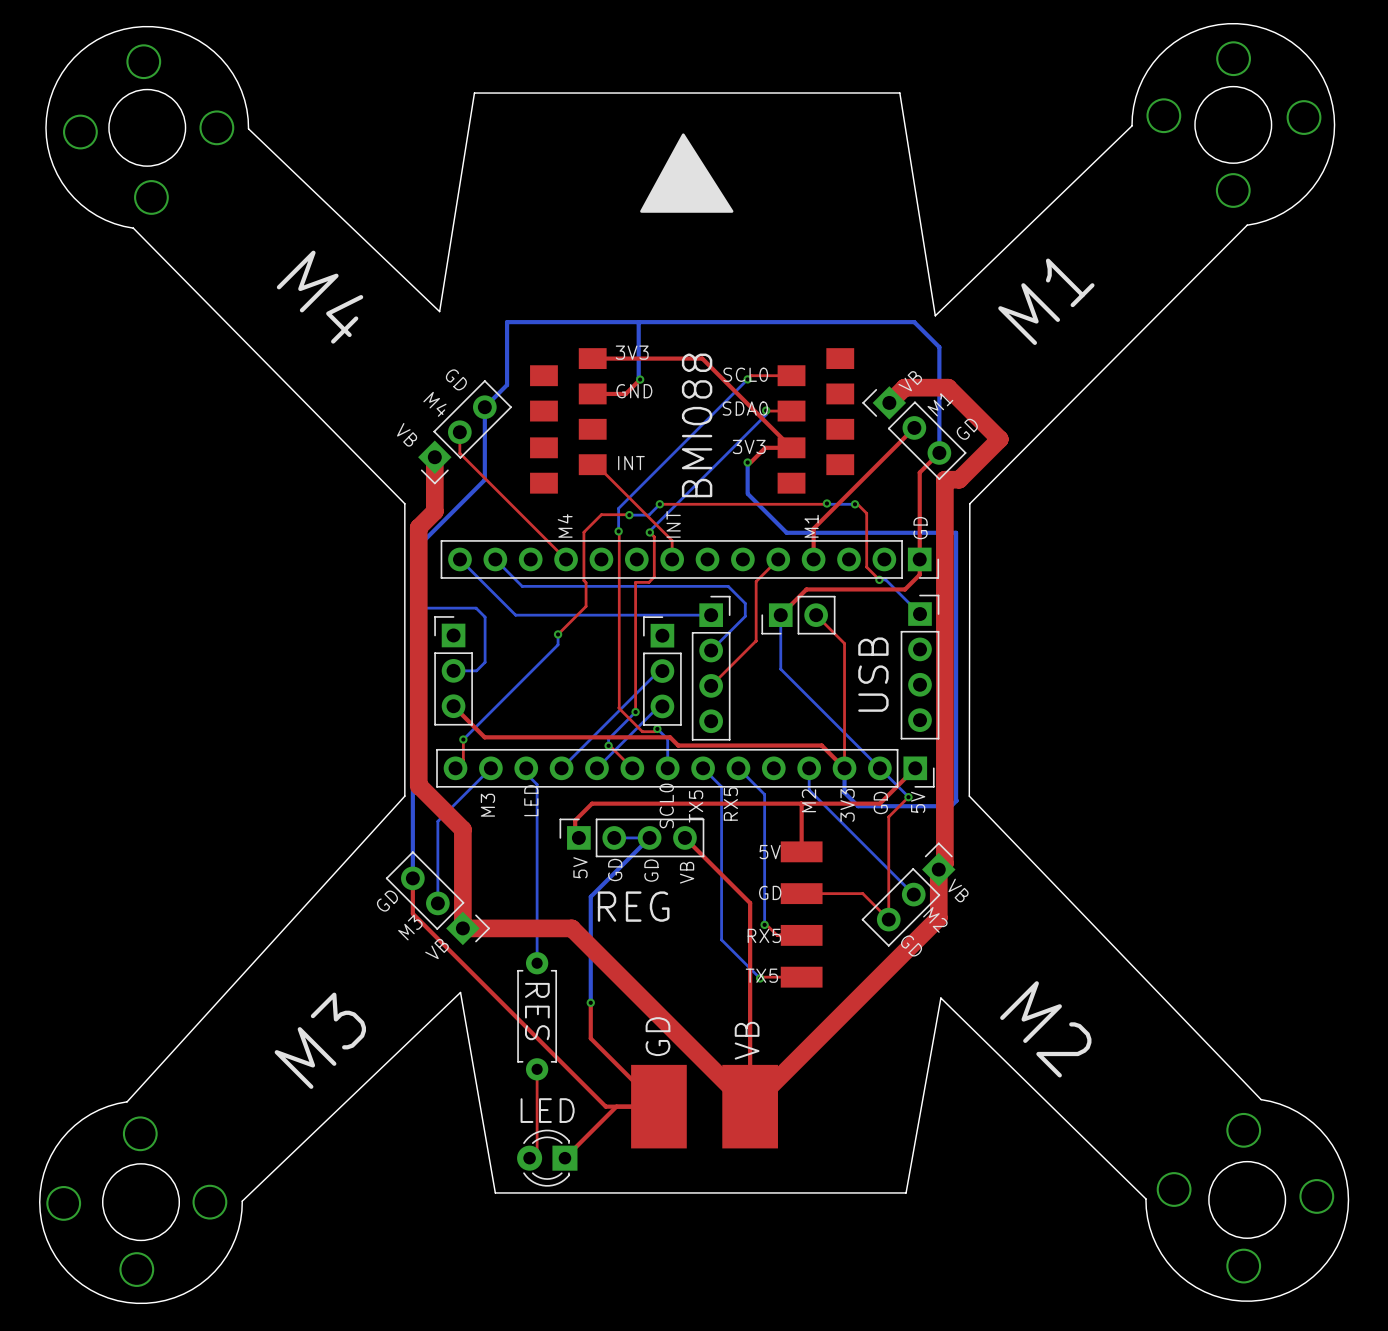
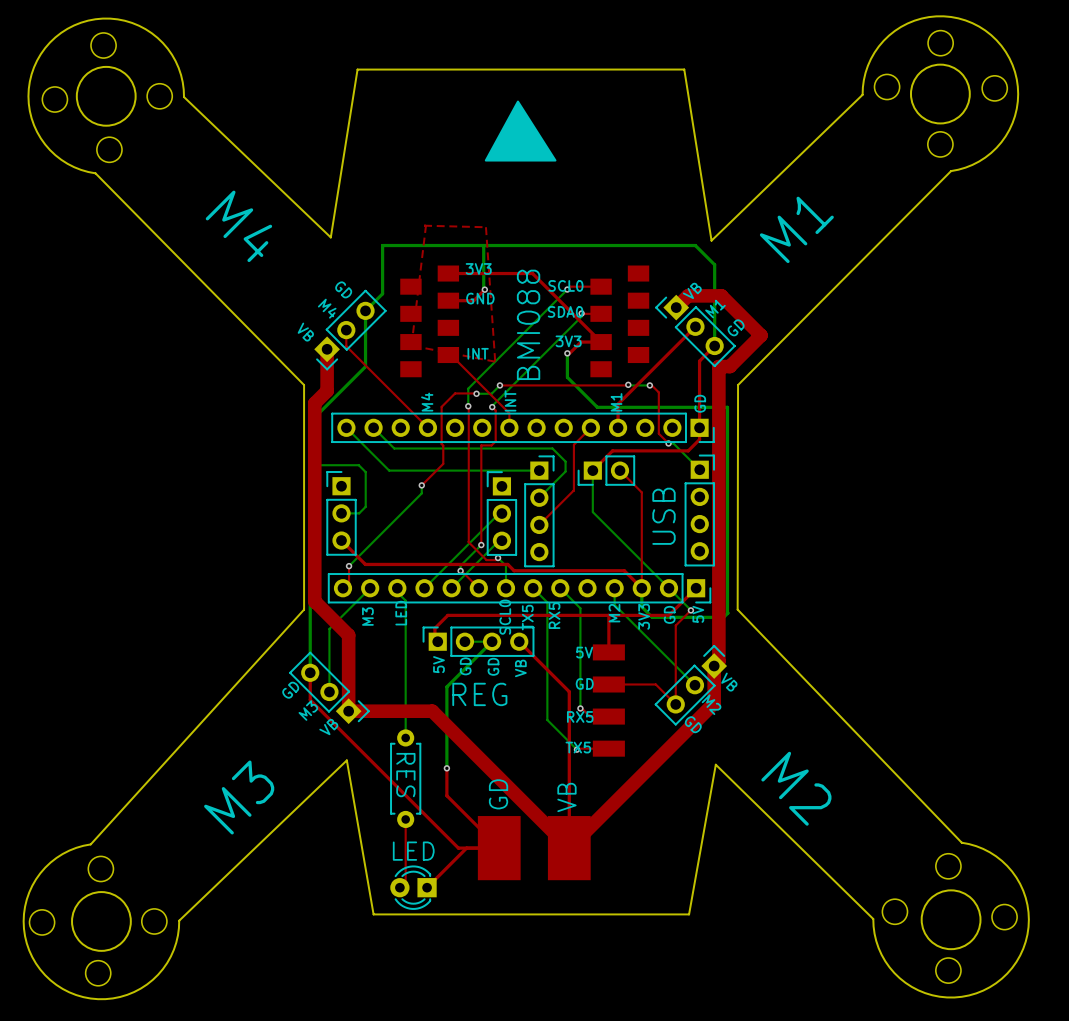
top zone outline: none -> (424, 225) (485, 227) (495, 361) (411, 345) (425, 225) (424, 225)

